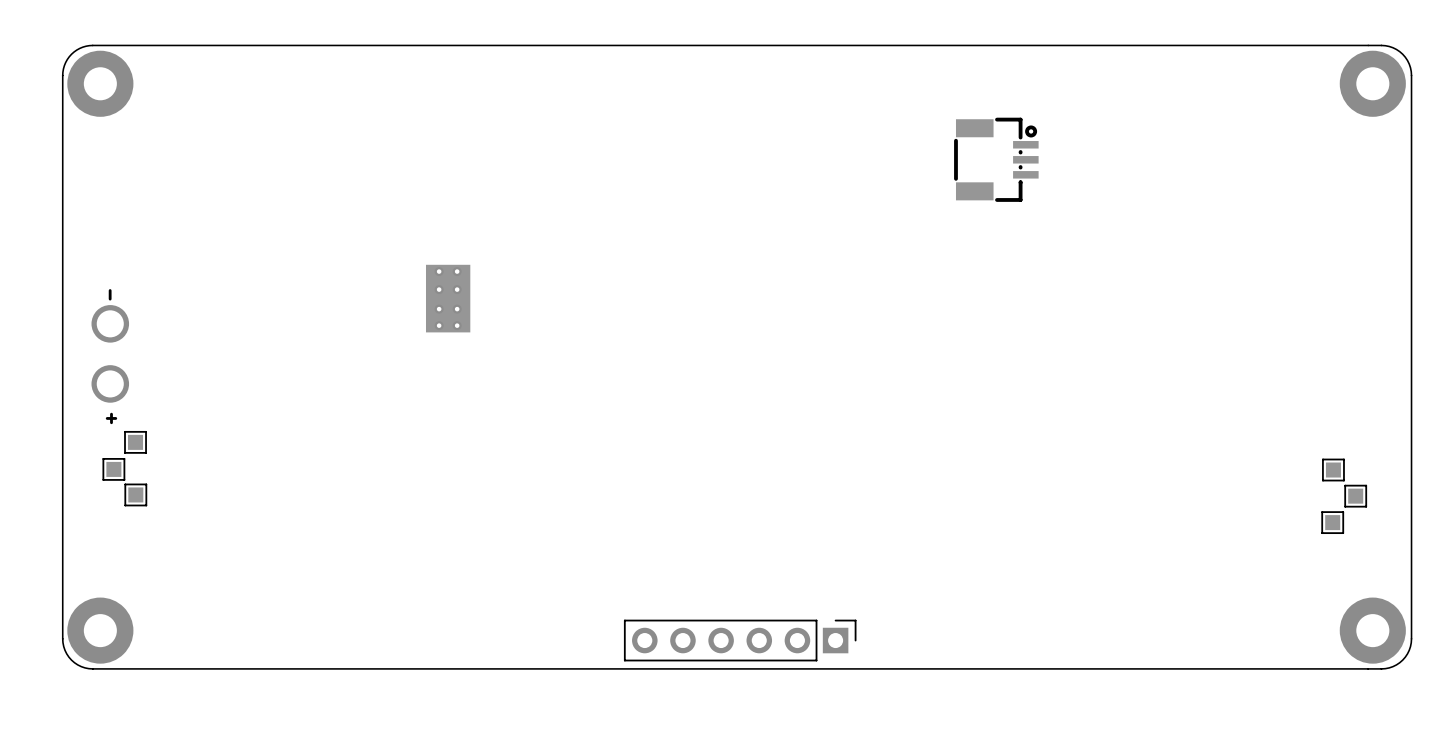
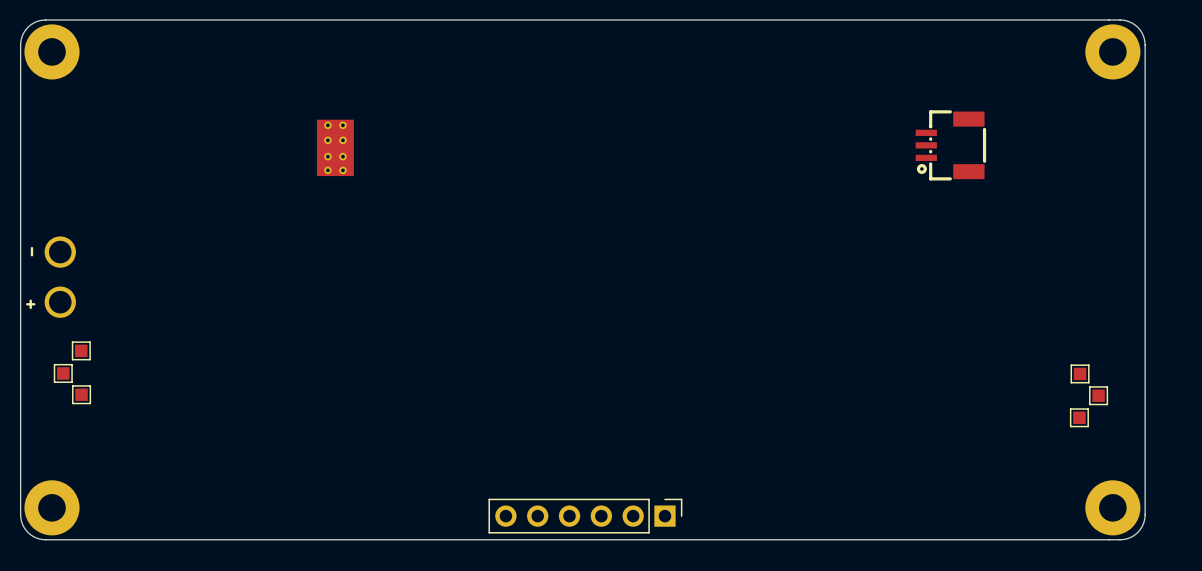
part rotation: 0° (996, 159) -> 180° (950, 145)
part position: (996, 159) -> (950, 145)
part text position: - (110, 294) -> - (31, 251)
part position: (448, 298) -> (335, 147)
part text position: + (111, 418) -> + (30, 304)

